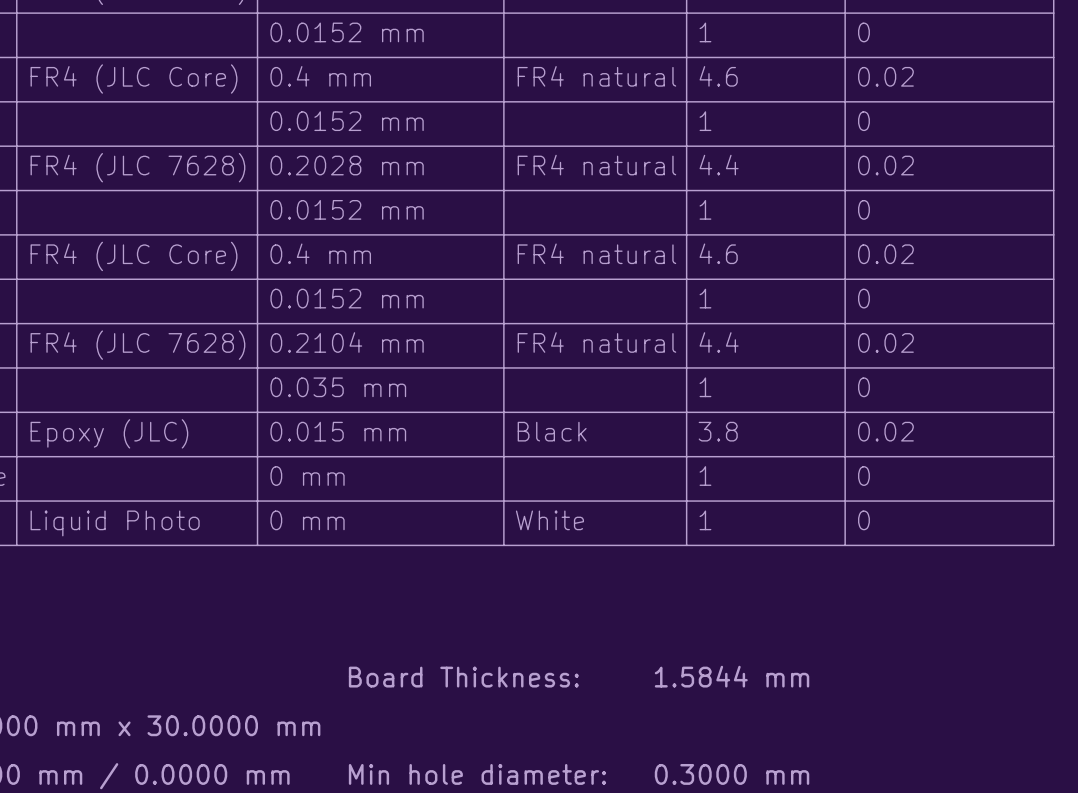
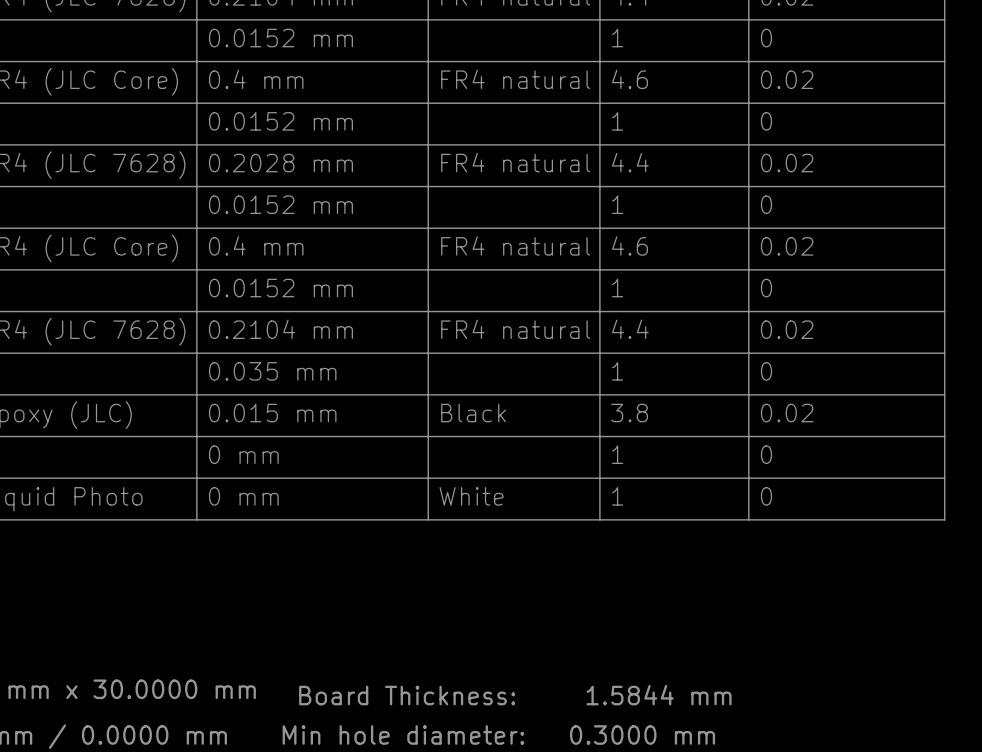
text position: 1.5844 mm (732, 676) -> 1.5844 mm (659, 695)
text position: Board Thickness: (463, 677) -> Board Thickness: (407, 695)

